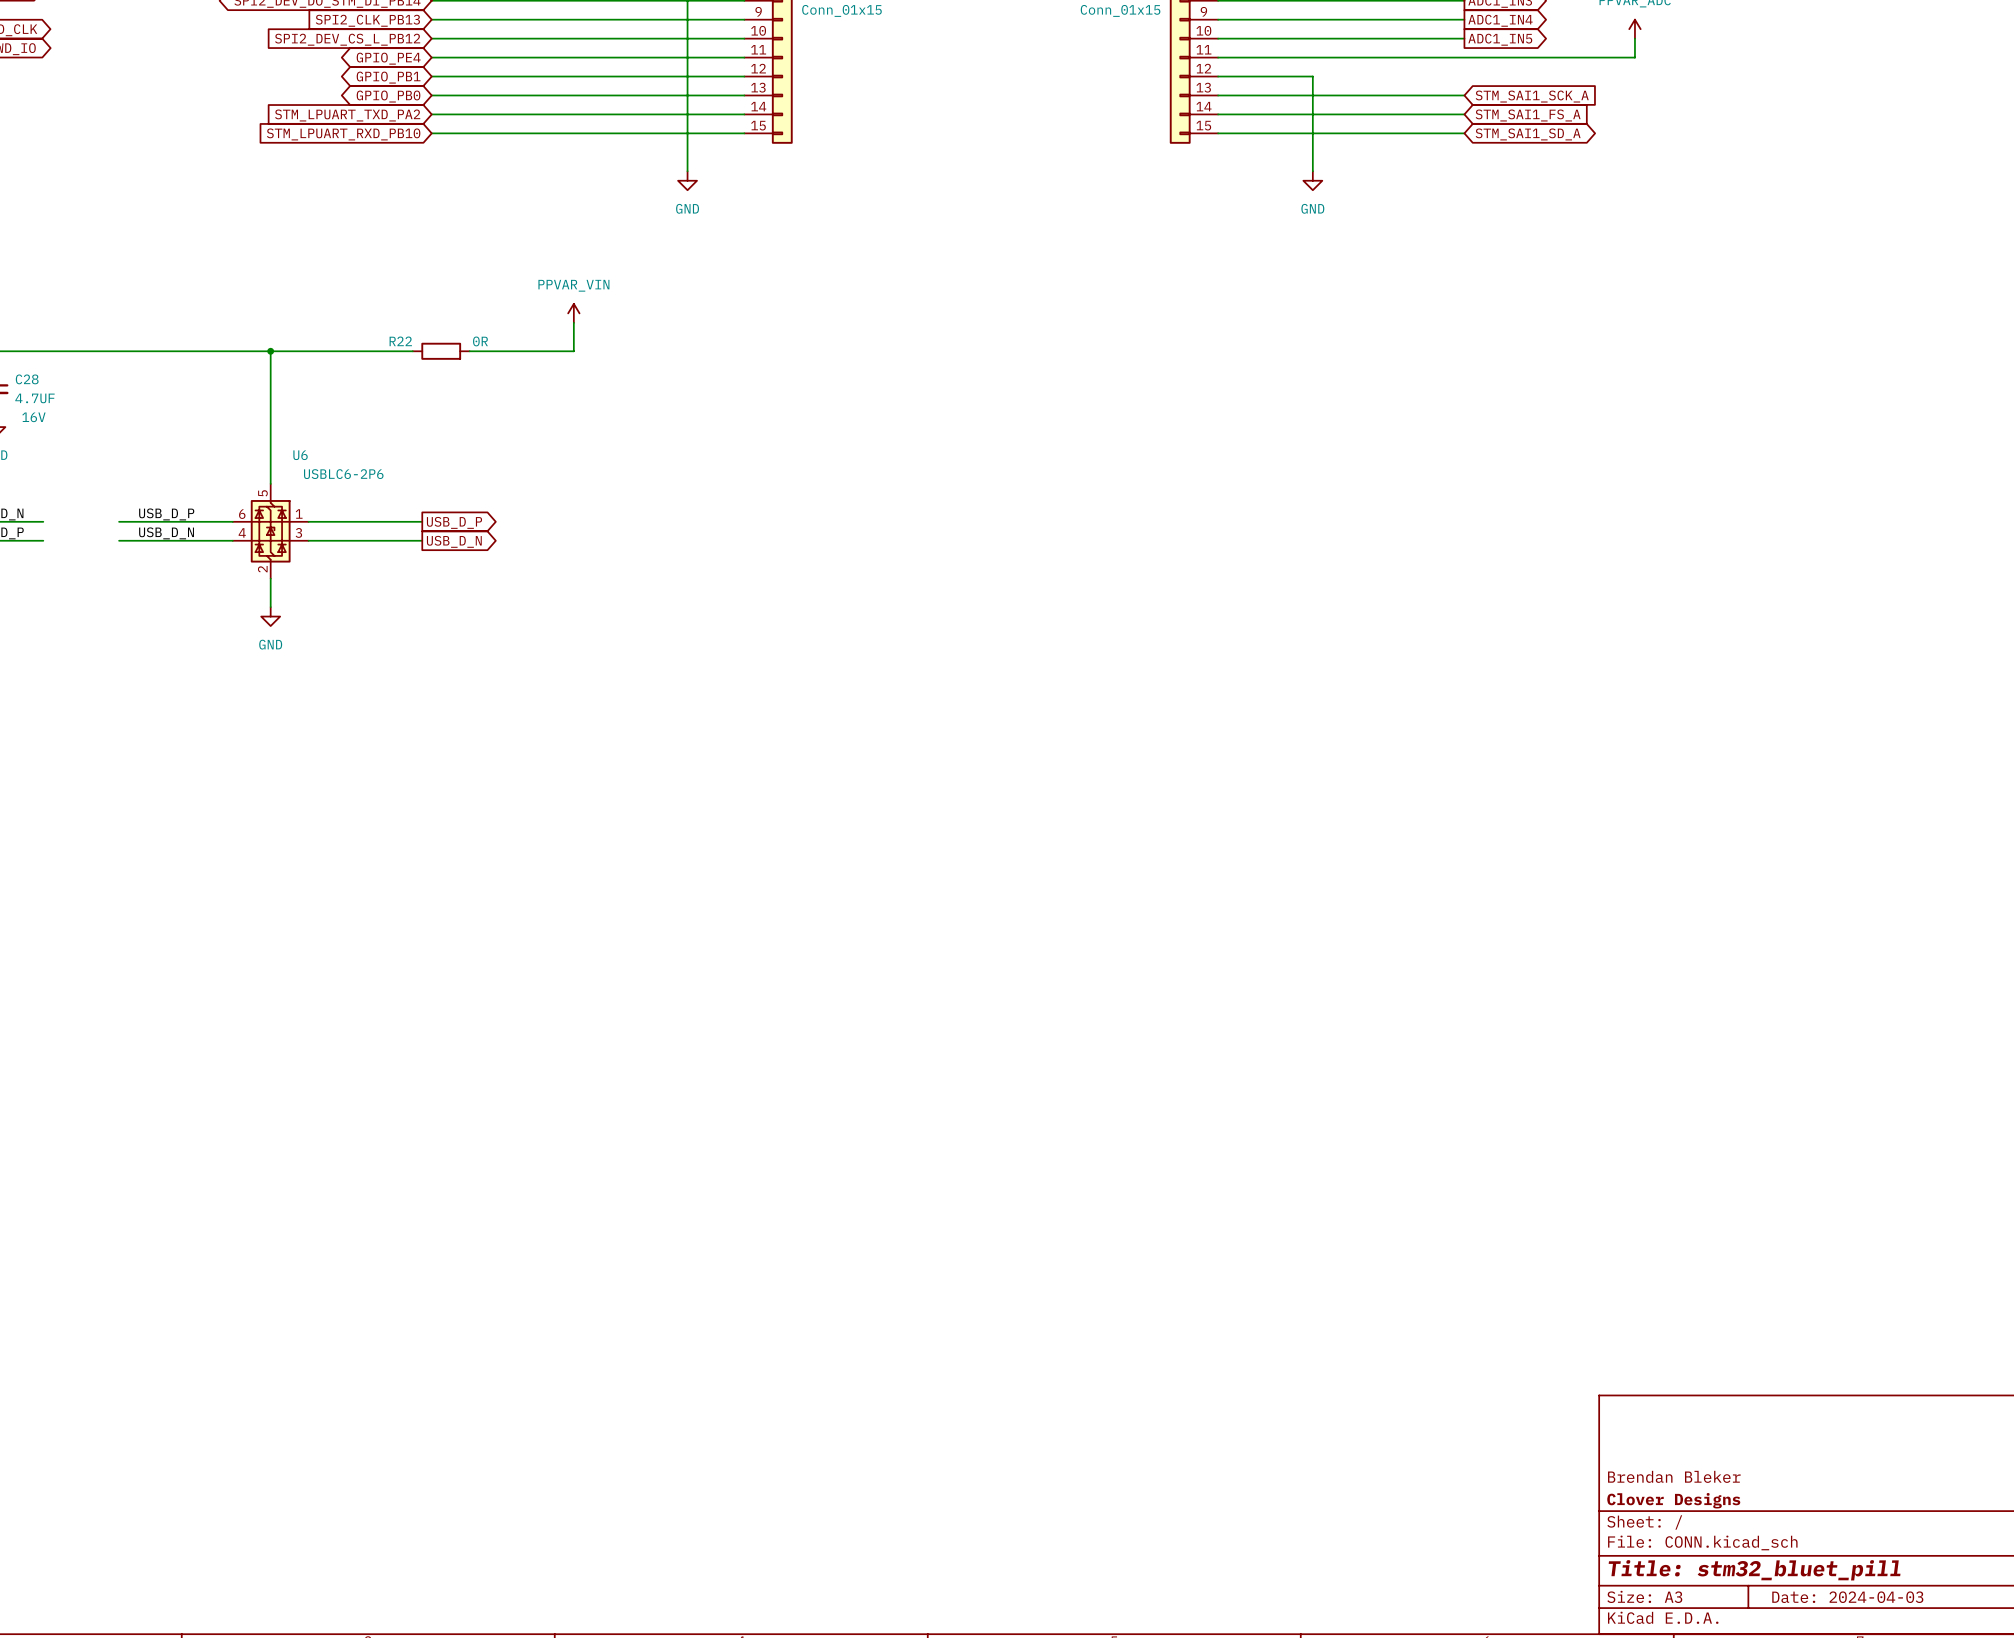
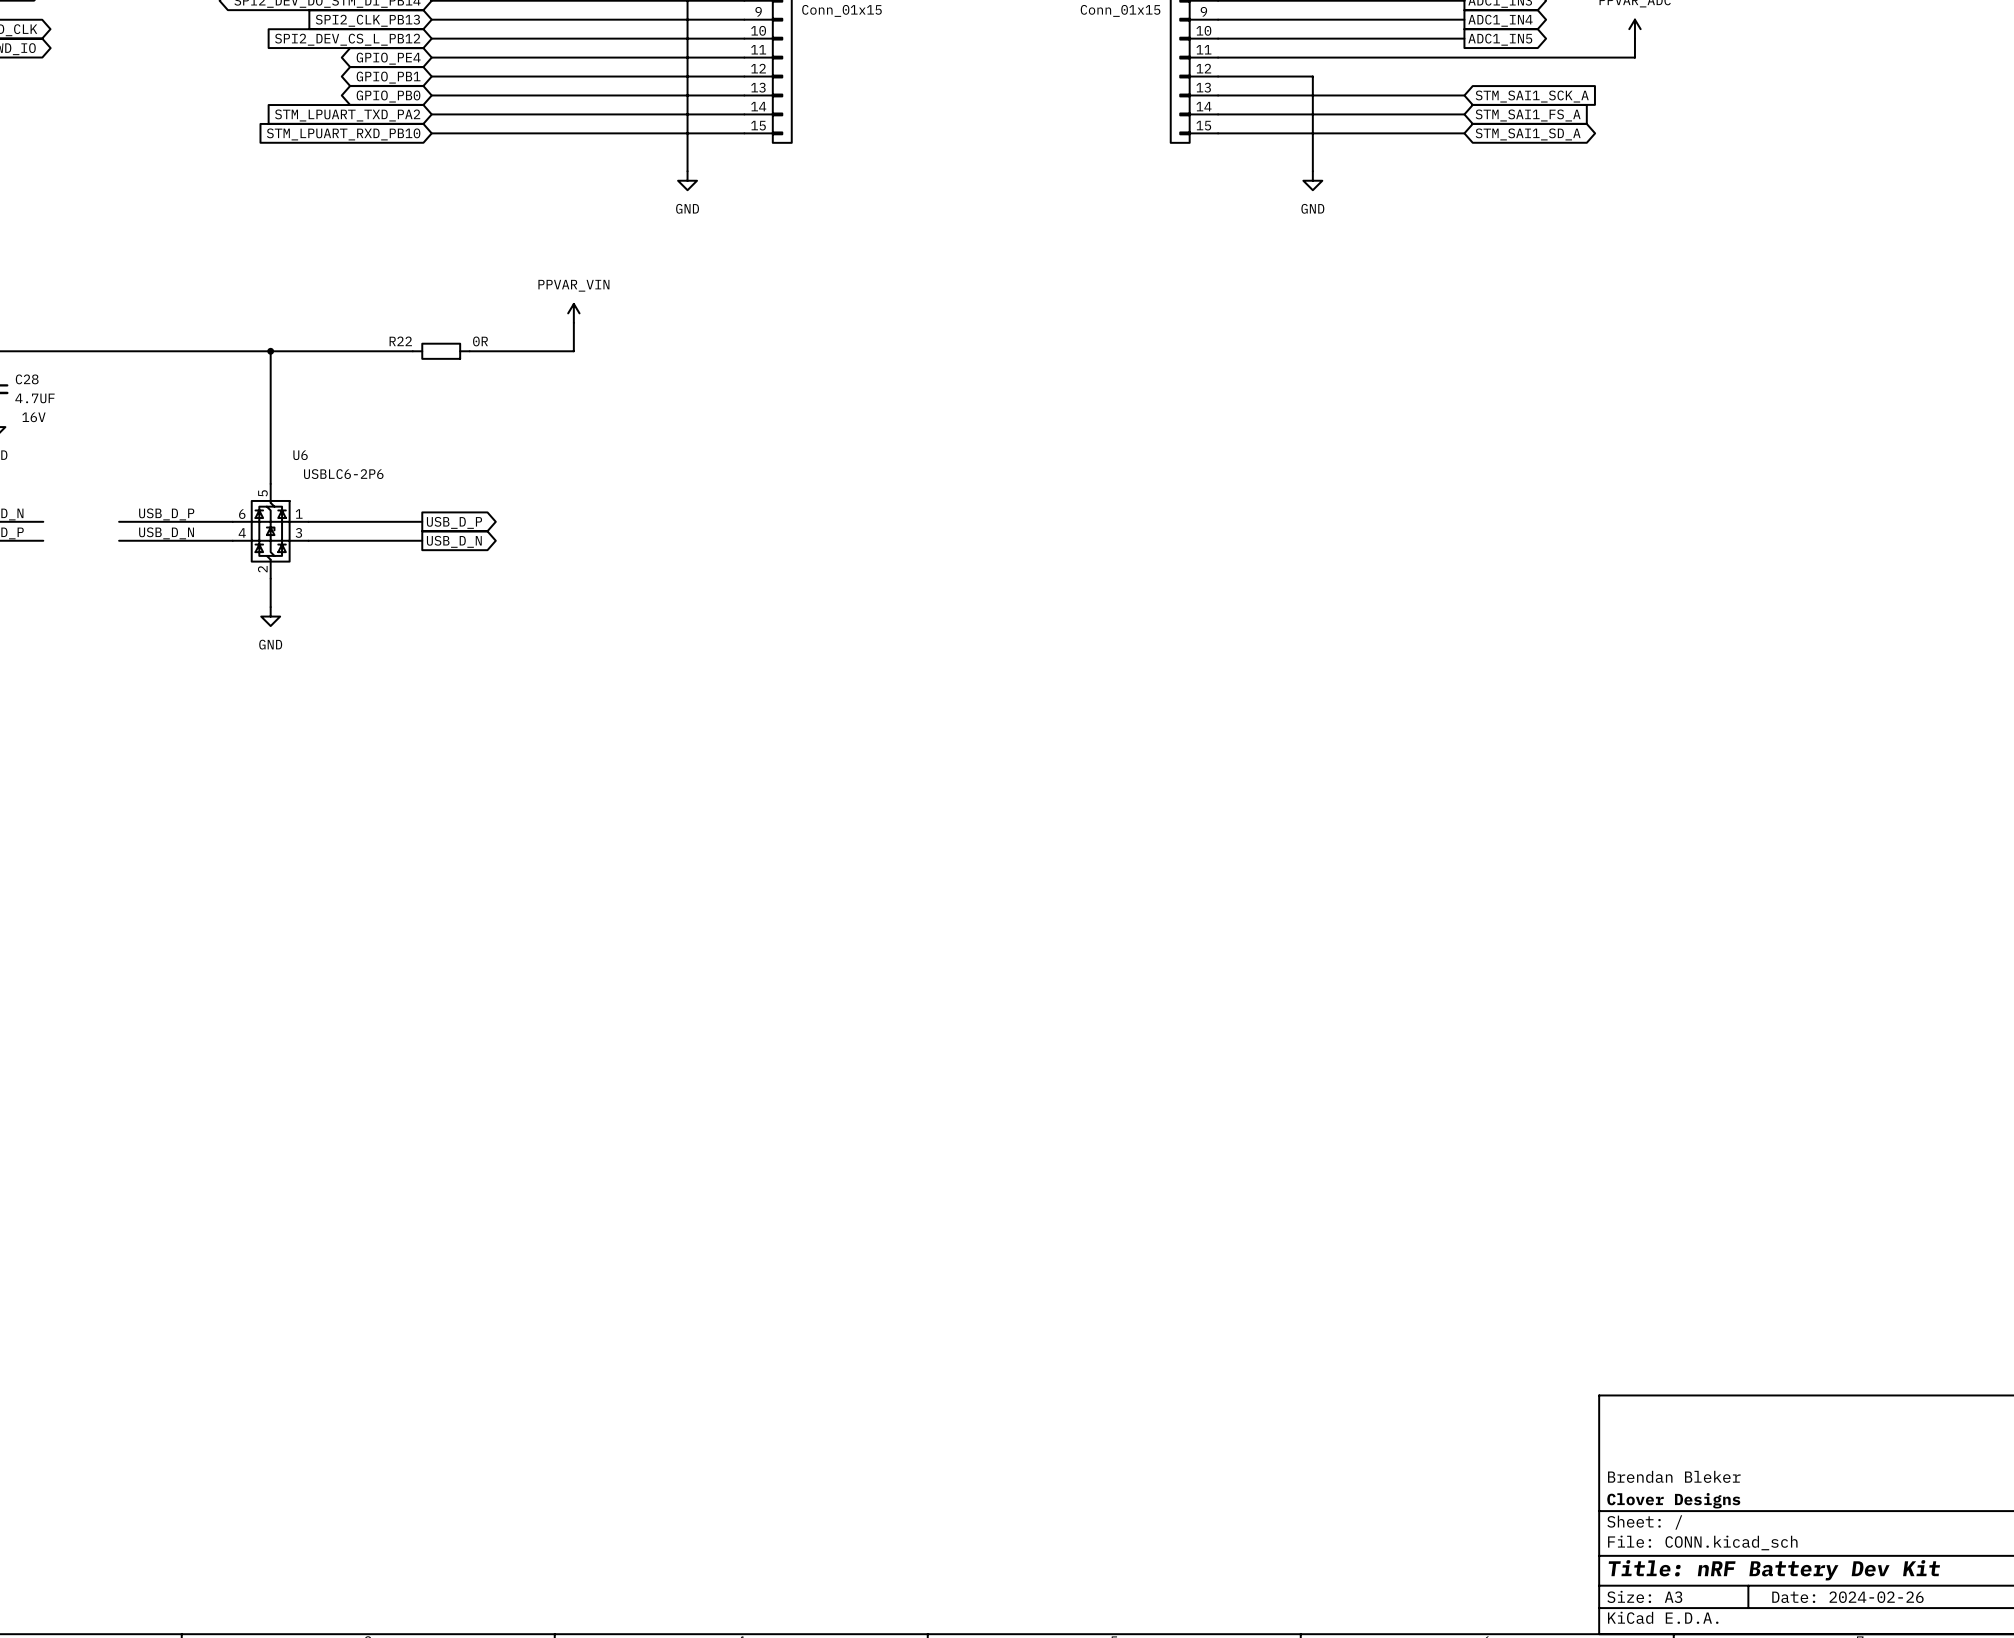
title block: Title: stm32_bluet_pill (1754, 1570) -> Title: nRF Battery Dev Kit (1774, 1570)
title block: Date: 2024-04-03 (1847, 1597) -> Date: 2024-02-26 (1847, 1597)

